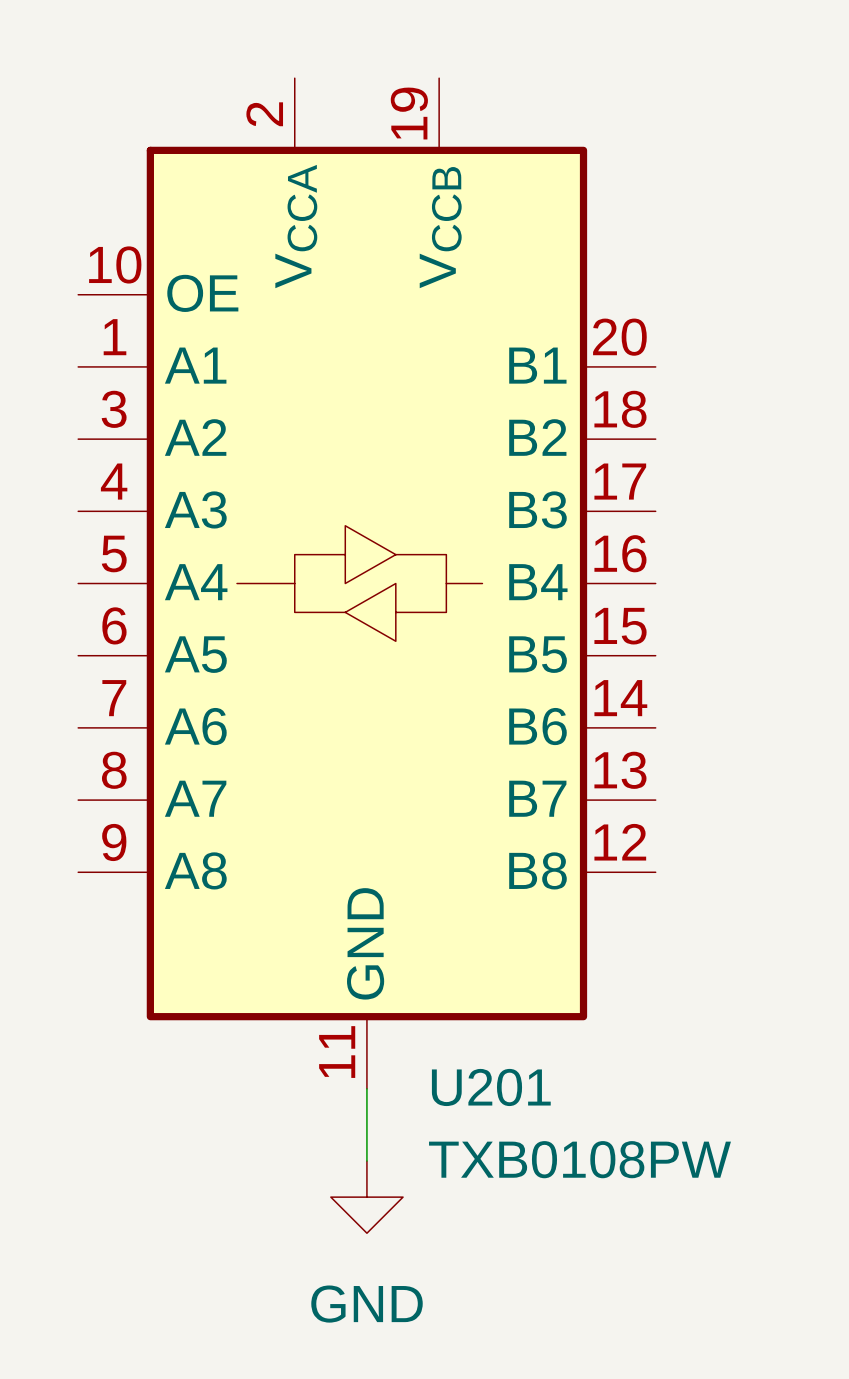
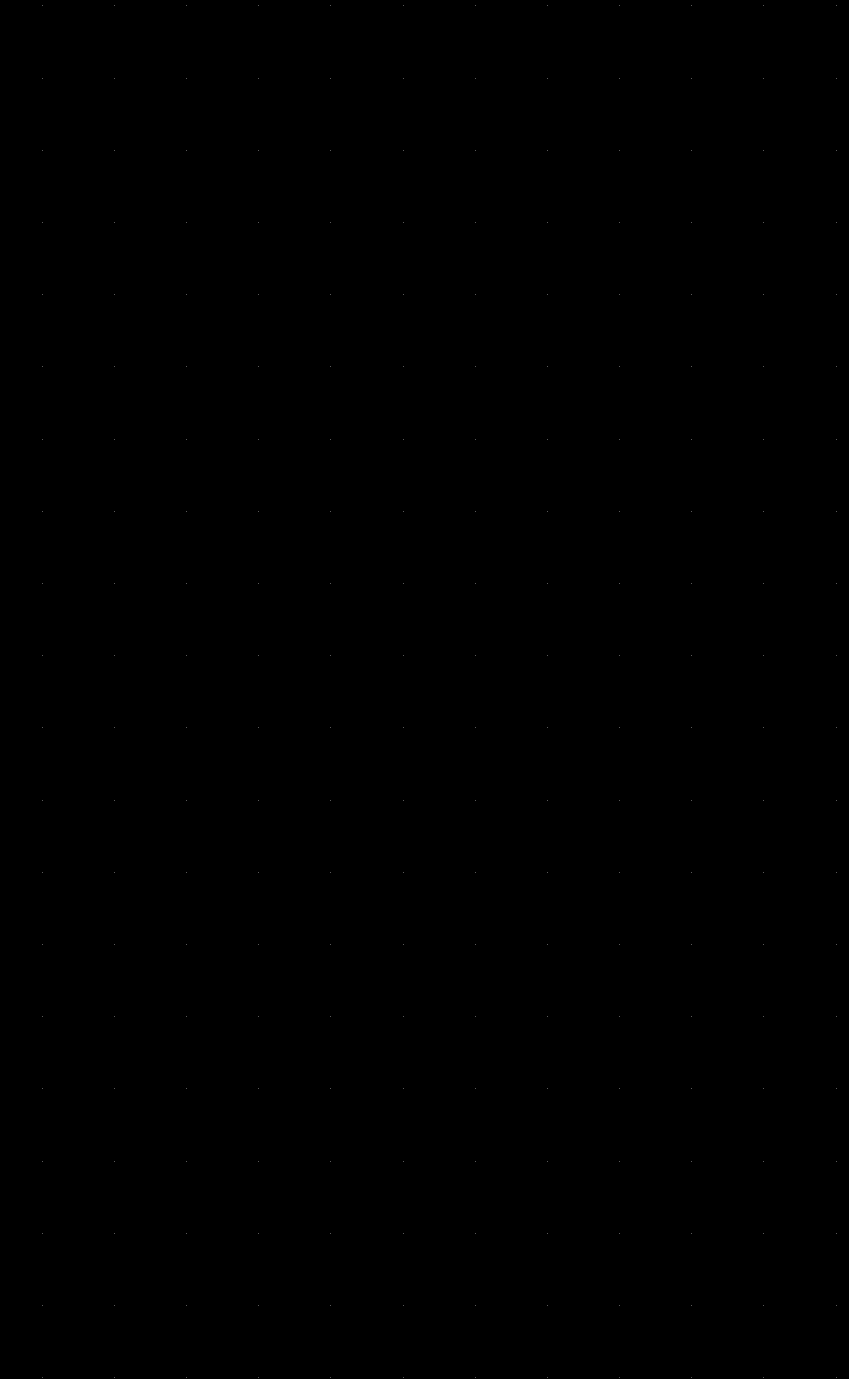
U201: TXB0108PW (366, 583) -> none
wire: (366, 1088) (366, 1161) -> none
power symbol: GND (366, 1197) -> none

